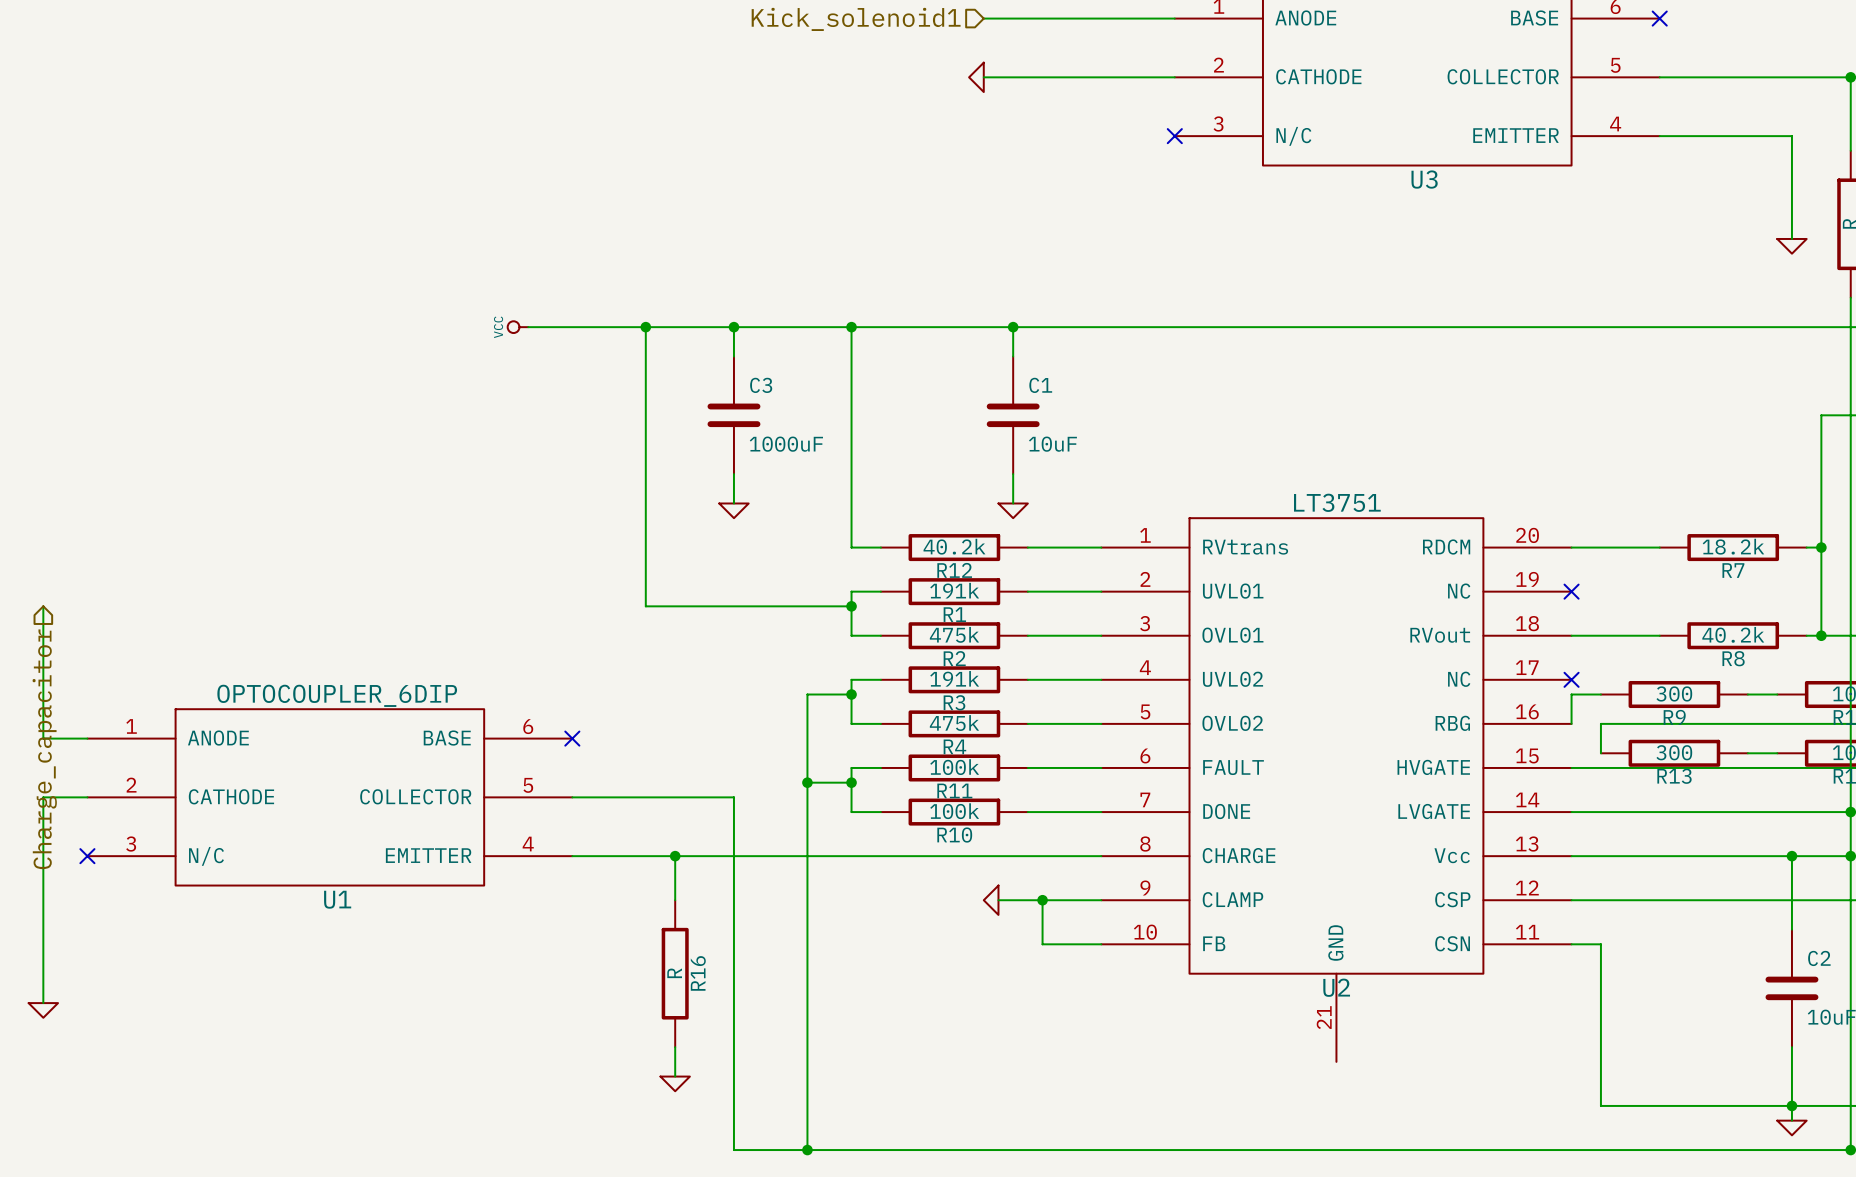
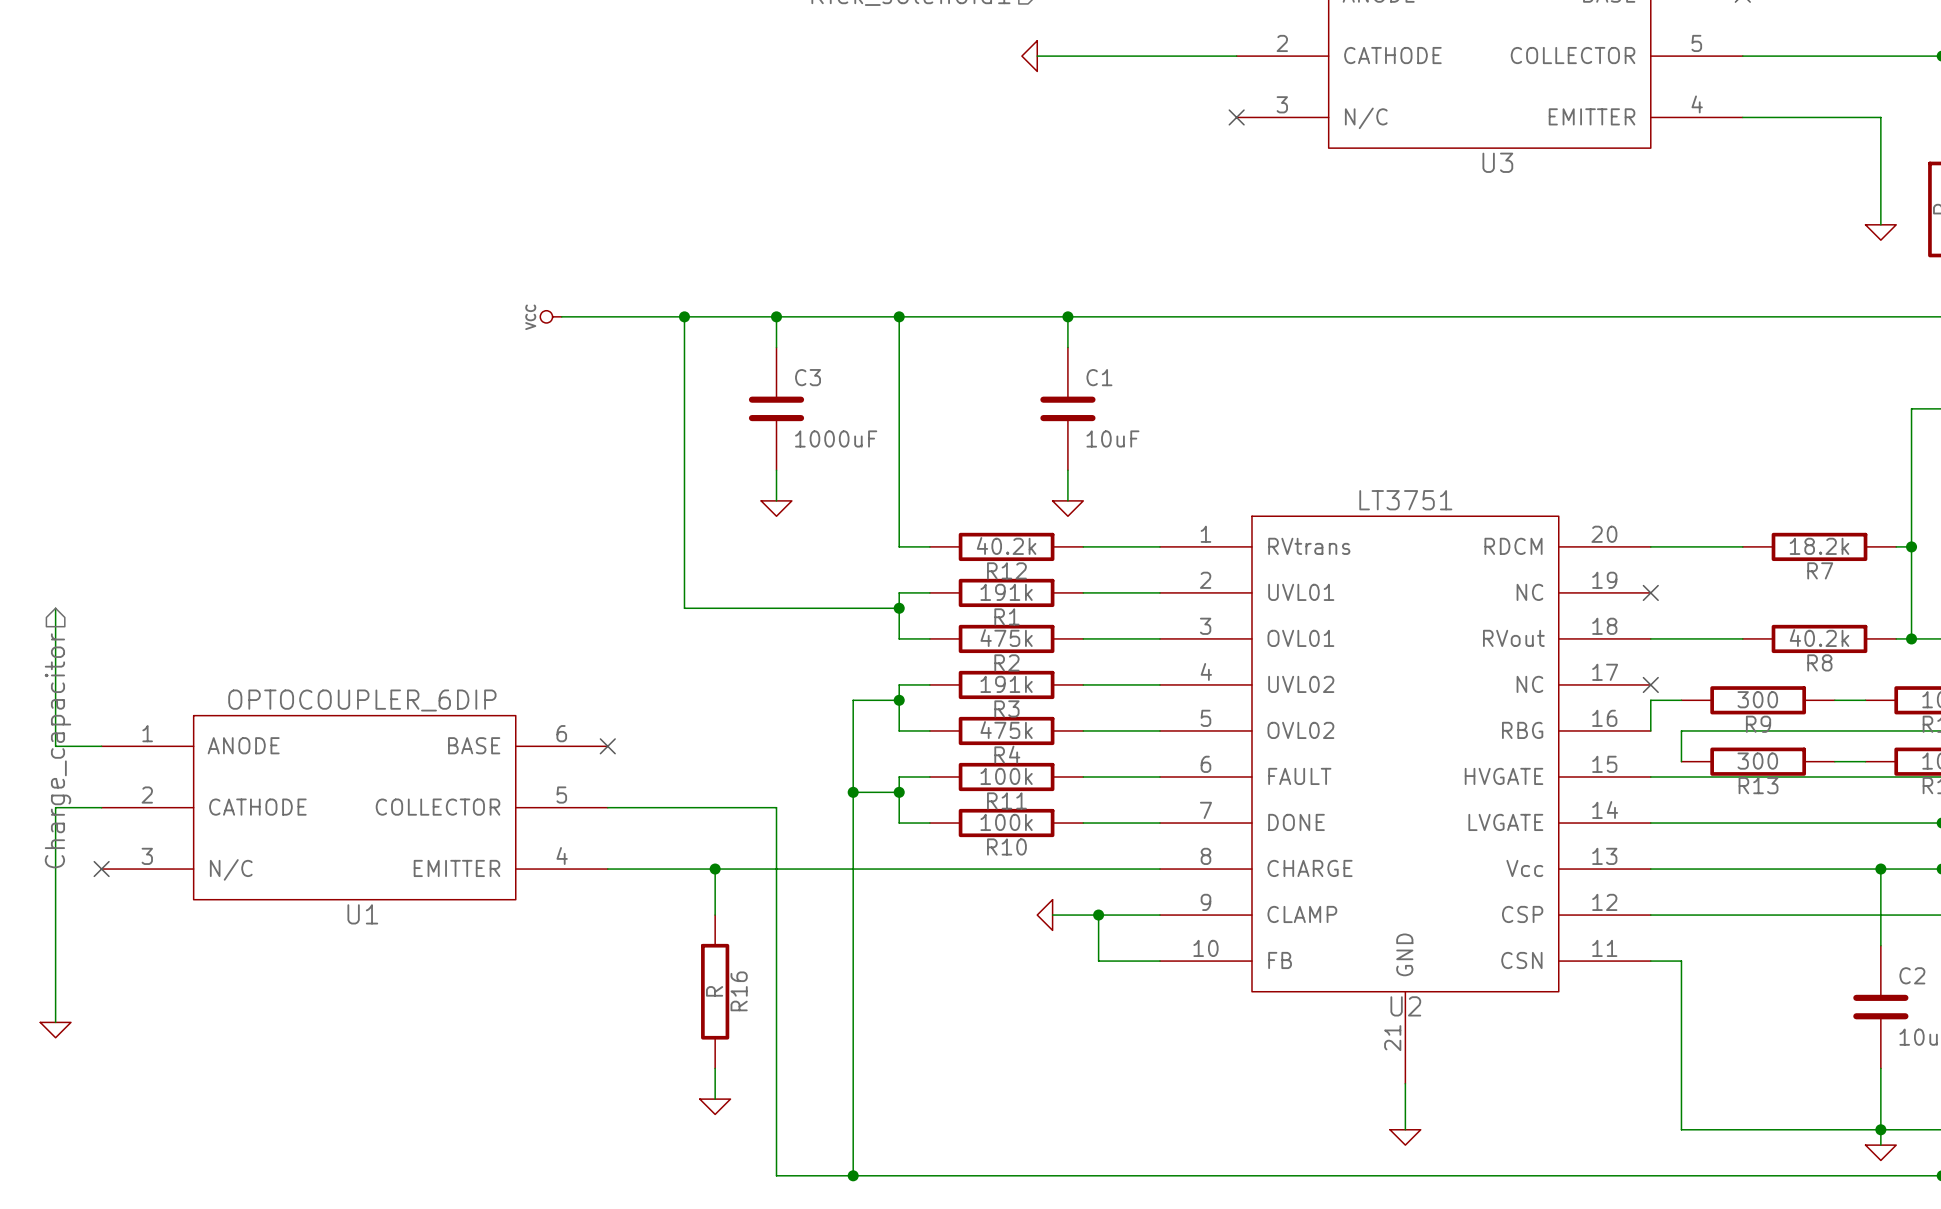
wire: none -> (1405, 1083) (1405, 1129)
power symbol: none -> (1405, 1137)

